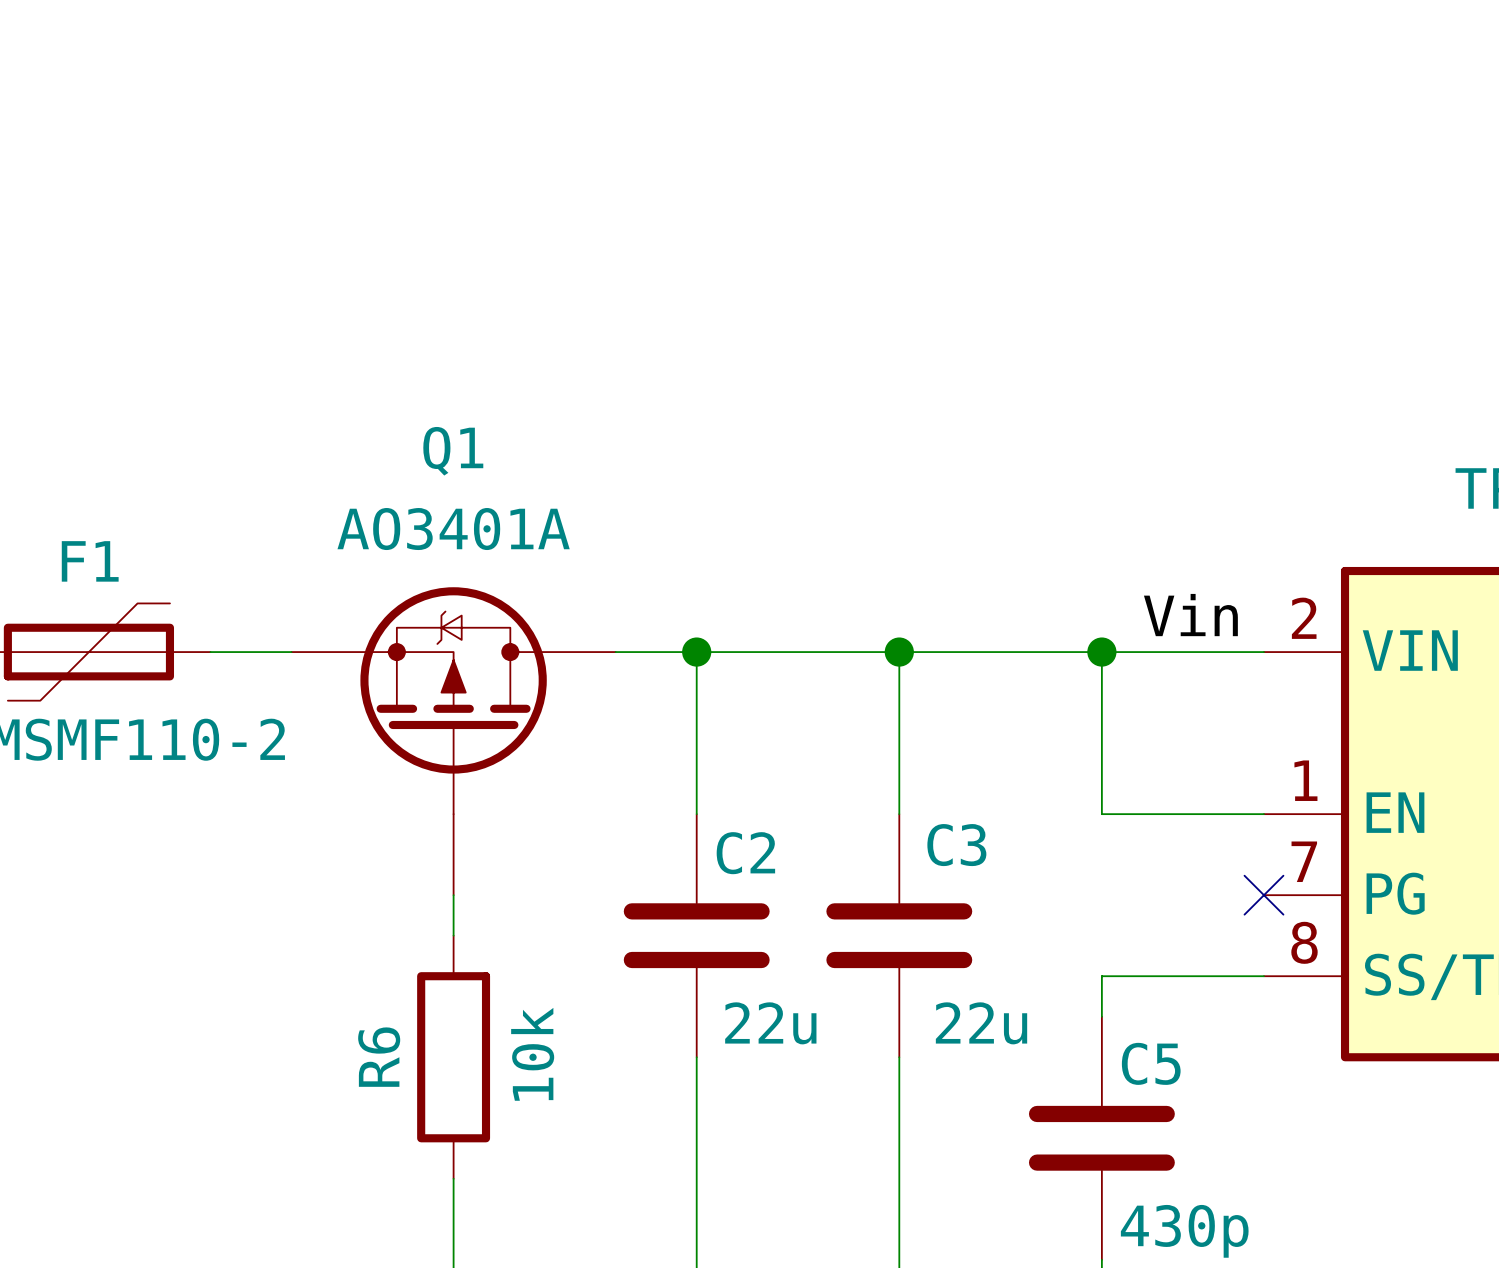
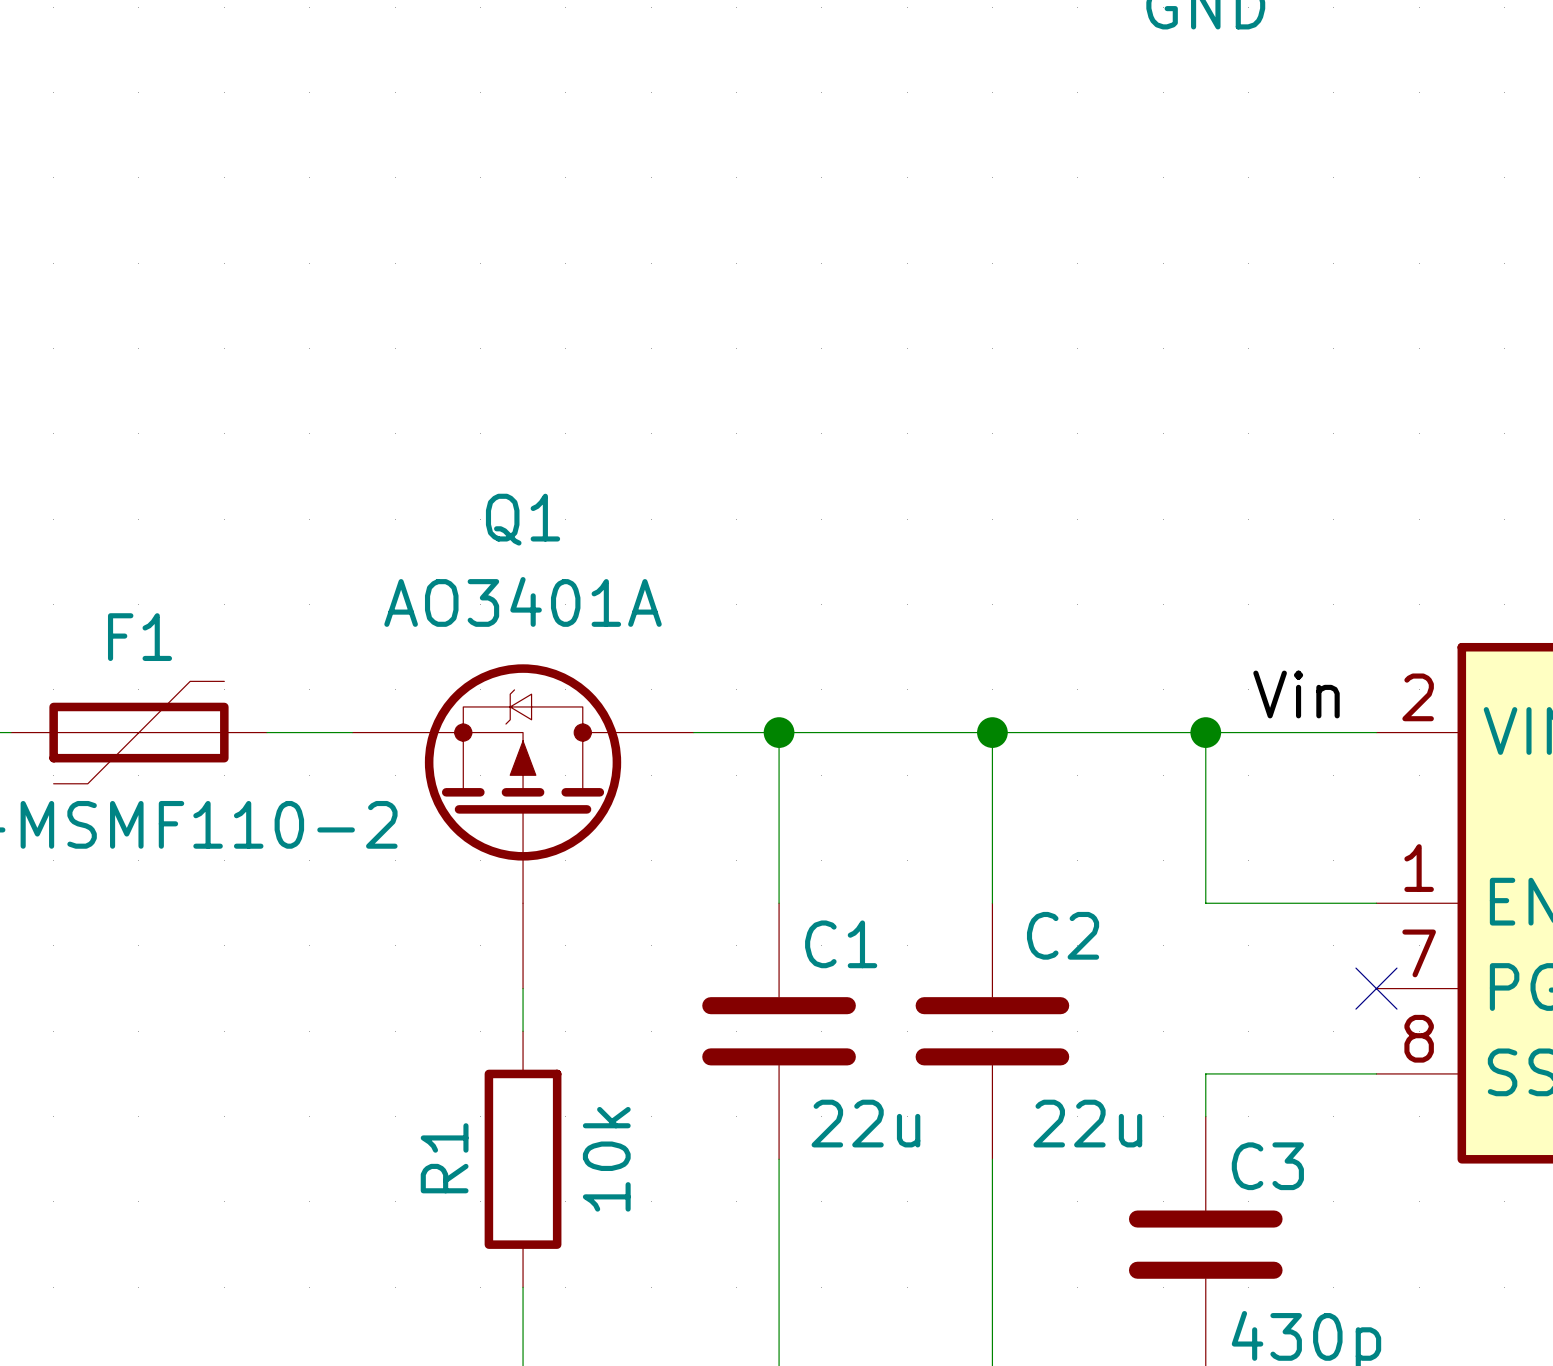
C3 name: C3 (956, 845) -> C2 (1063, 935)
C2 name: C2 (745, 853) -> C1 (841, 944)
R6 name: R6 (379, 1057) -> R1 (444, 1158)
C5 name: C5 (1151, 1063) -> C3 (1267, 1166)

